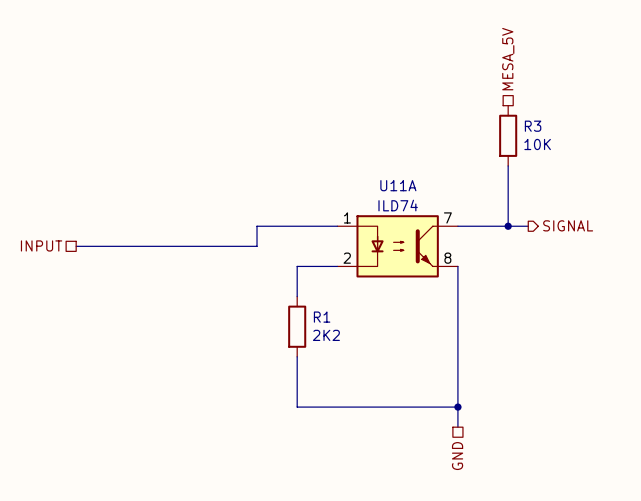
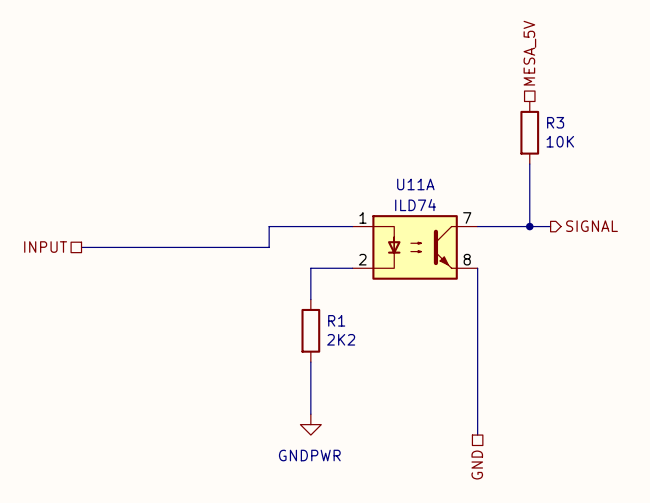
wire: (297, 407) (457, 407) -> none
junction: (457, 407) -> none
power symbol: none -> GNDPWR (310, 424)

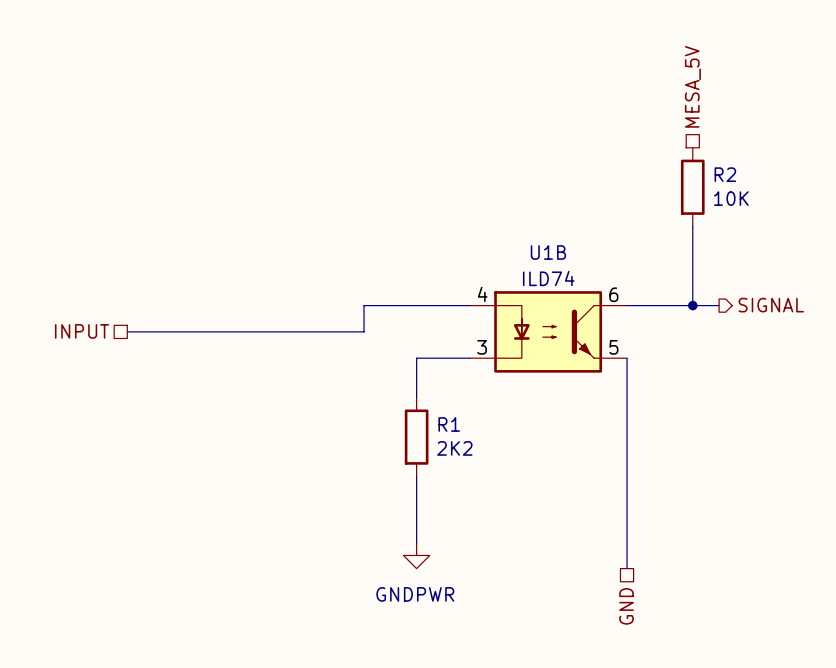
R3 name: R3 (555, 122) -> R2 (725, 174)
U11A name: U11A (415, 184) -> U1B (548, 252)
U11A pin number: 1 (362, 217) -> 4 (482, 294)
U11A pin number: 7 (467, 217) -> 6 (613, 294)
U11A pin number: 2 (362, 259) -> 3 (482, 347)
U11A pin number: 8 (467, 259) -> 5 (613, 347)

